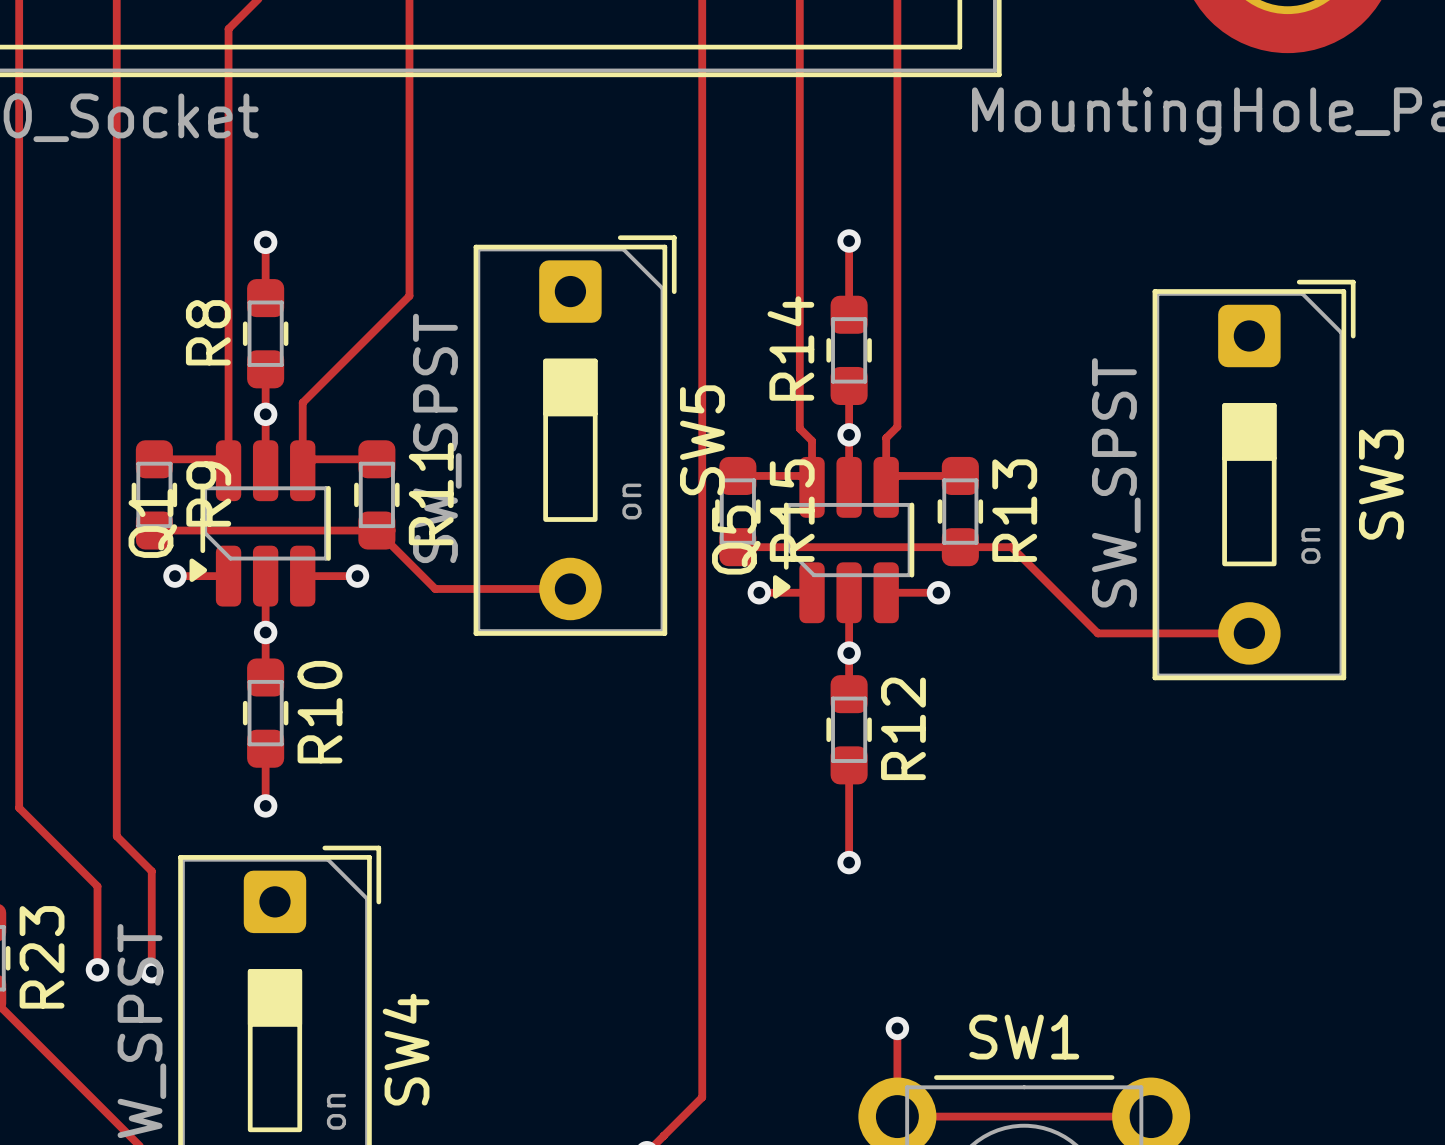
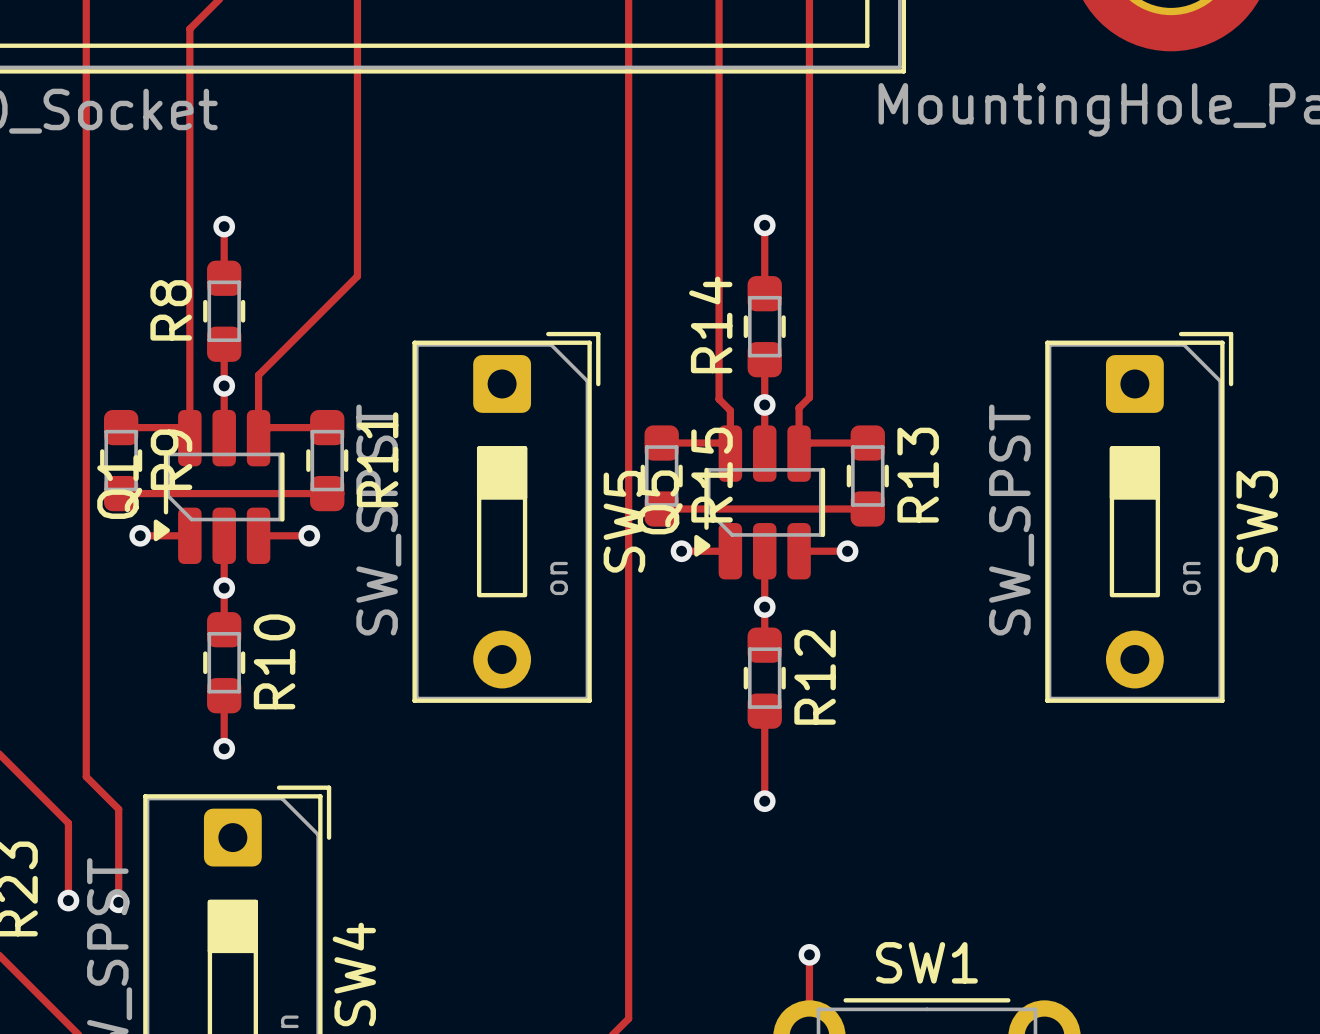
SW5 position: (575, 435) -> (506, 517)
SW3 position: (1254, 480) -> (1139, 517)
track: (376, 530) (435, 588) (570, 588) -> none
track: (960, 547) (1011, 547) (1097, 633) (1249, 633) -> none

